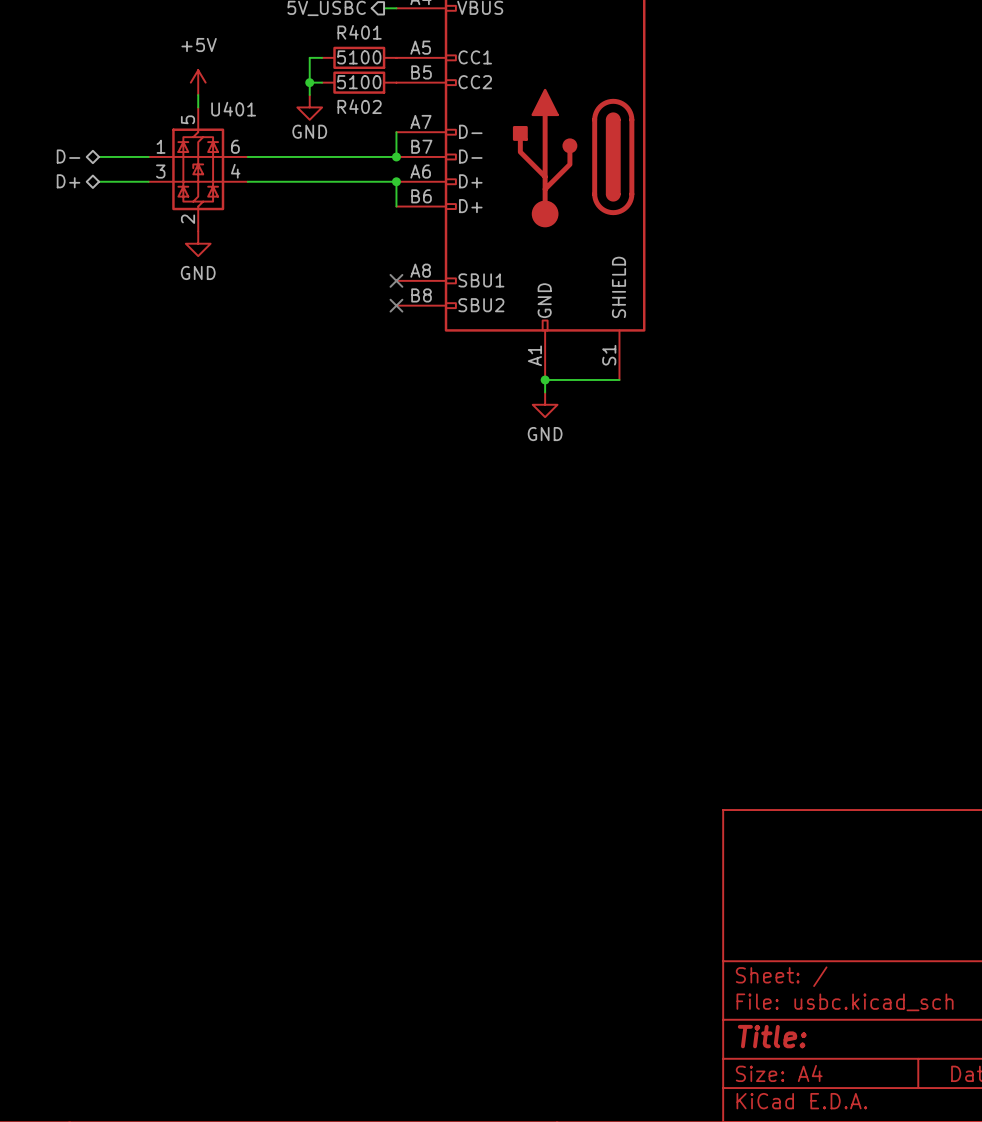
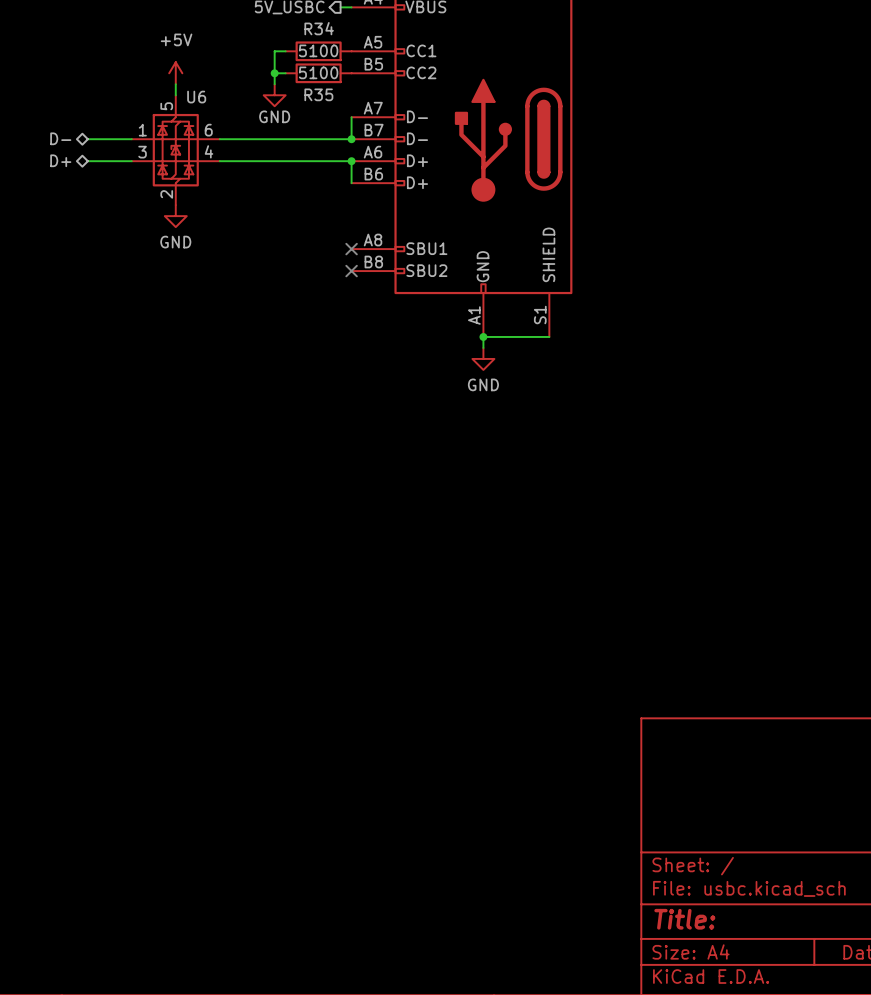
R401 name: R401 (359, 32) -> R34 (319, 28)
R402 name: R402 (359, 106) -> R35 (318, 94)
U401 name: U401 (233, 109) -> U6 (196, 97)

